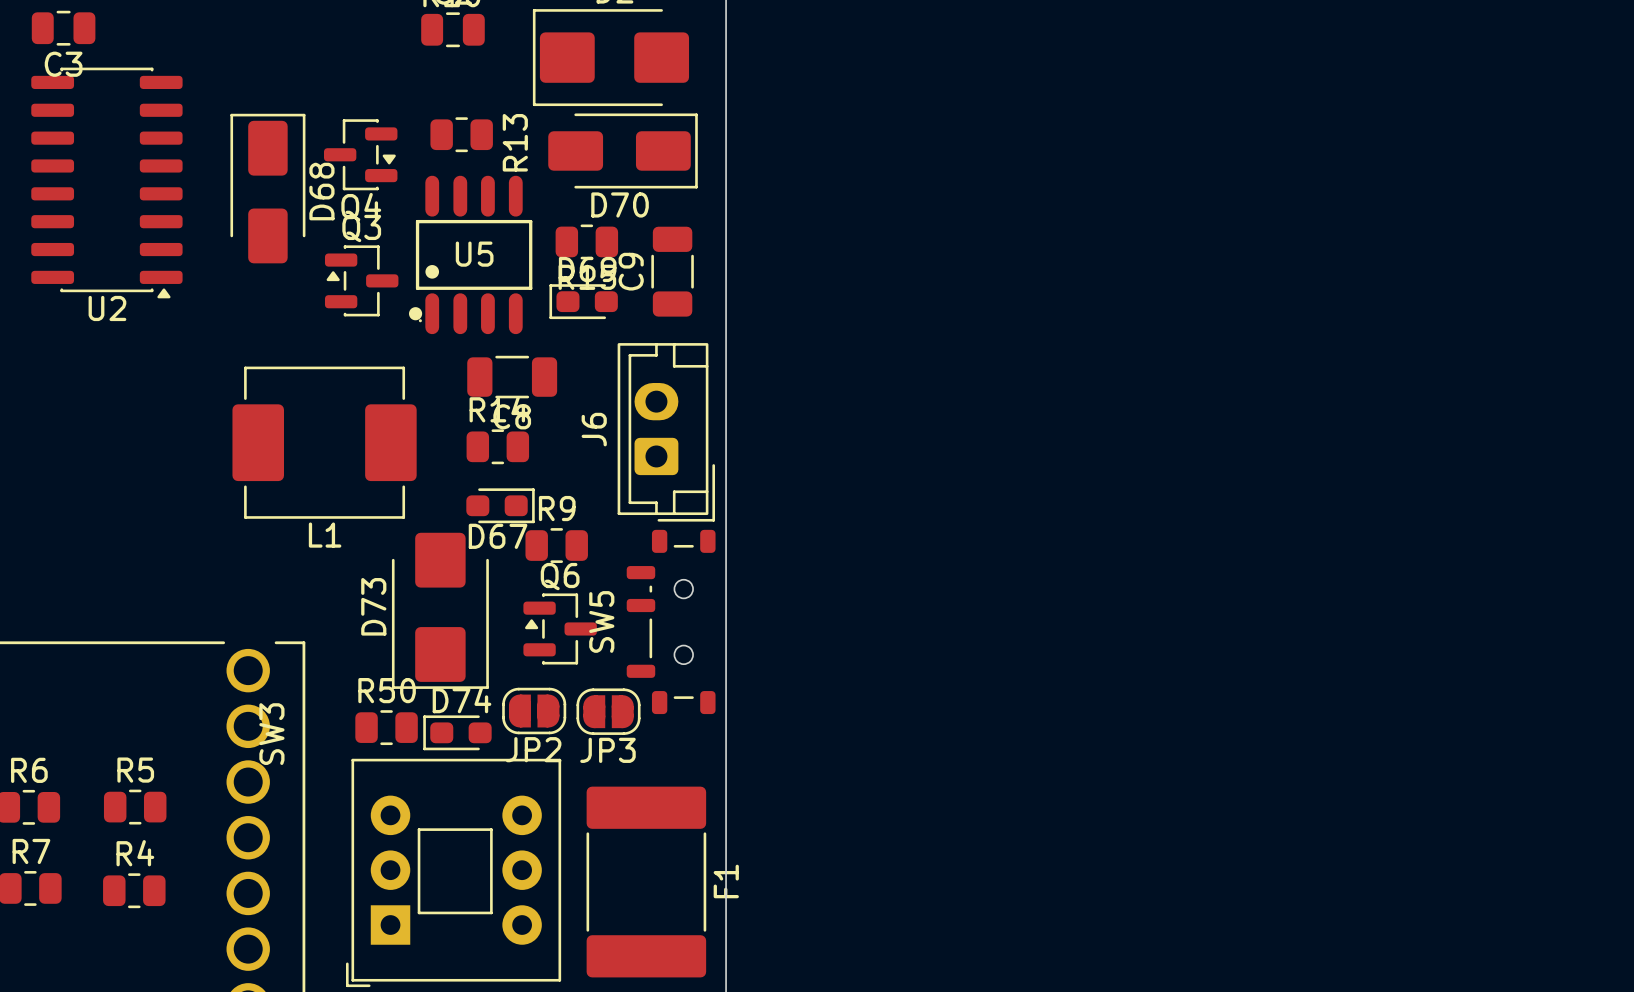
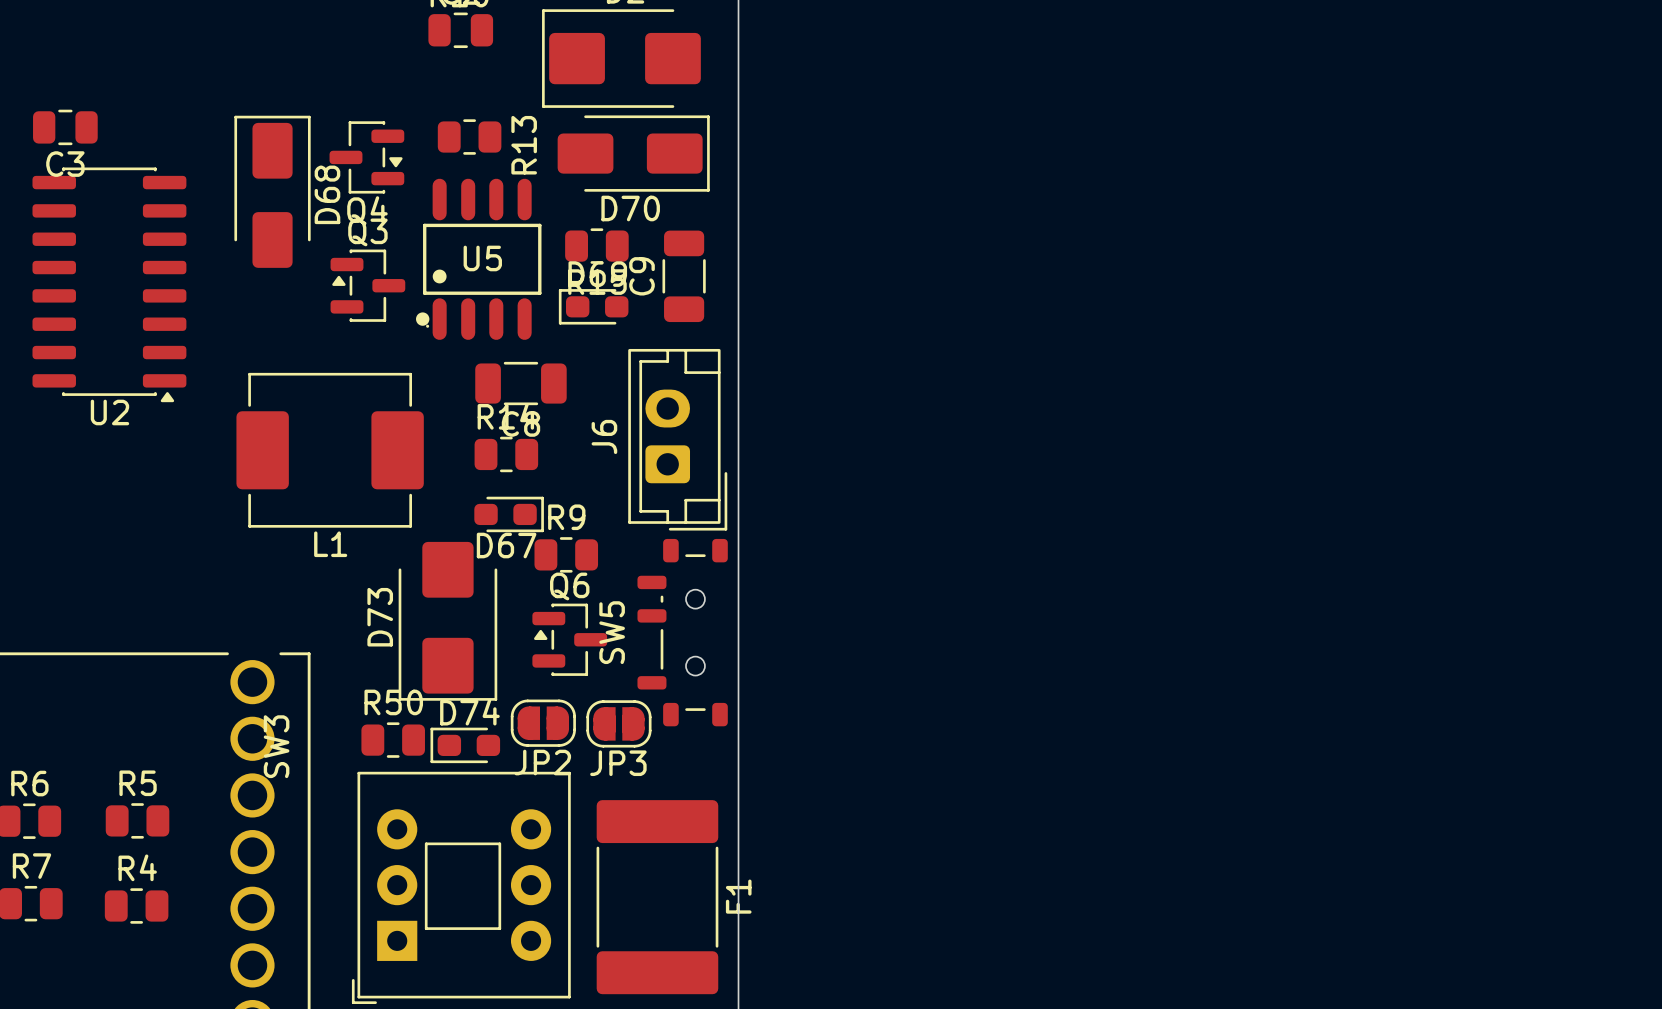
C3 position: (63, 28) -> (65, 127)
U2 position: (106, 182) -> (109, 284)

